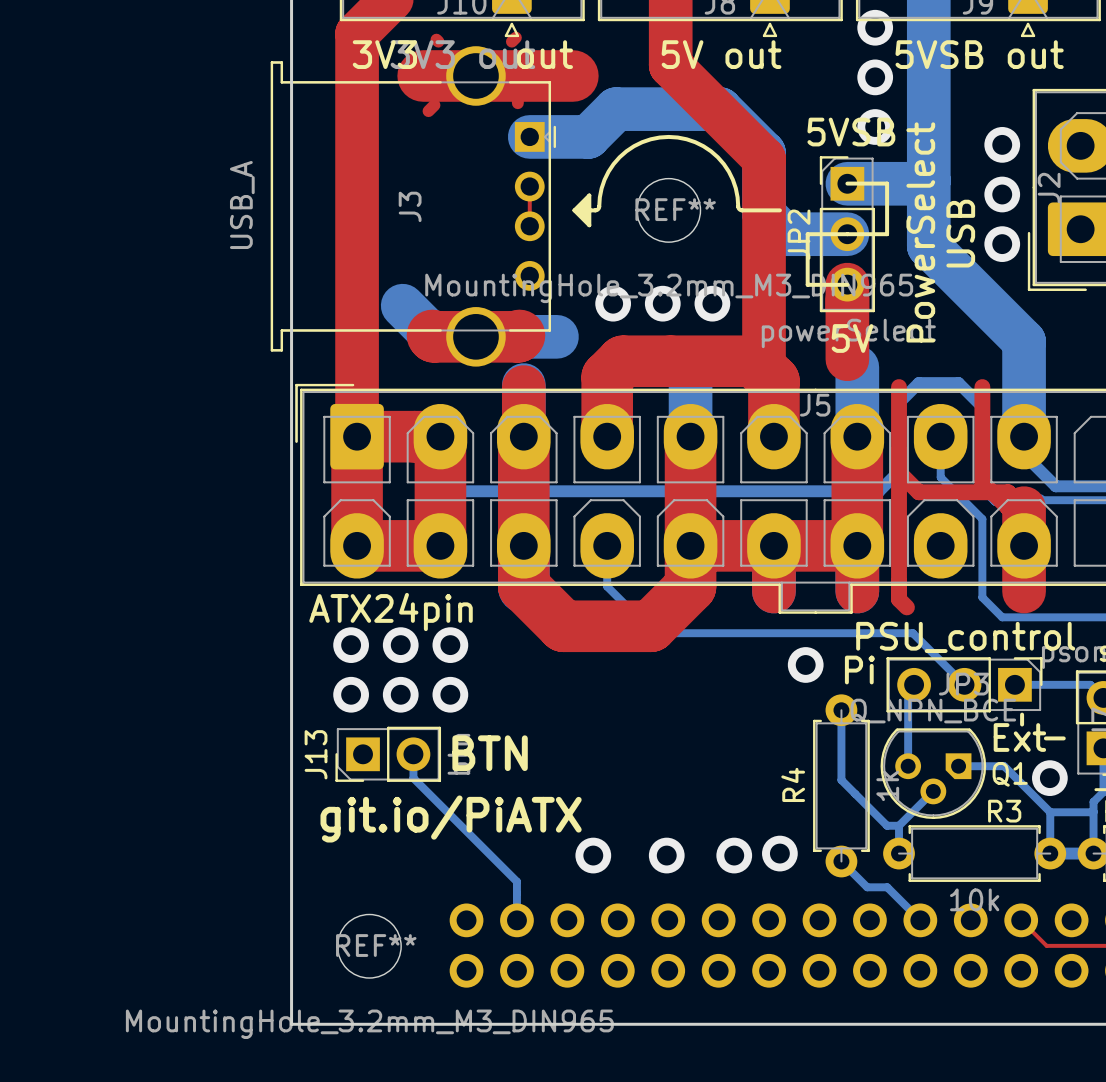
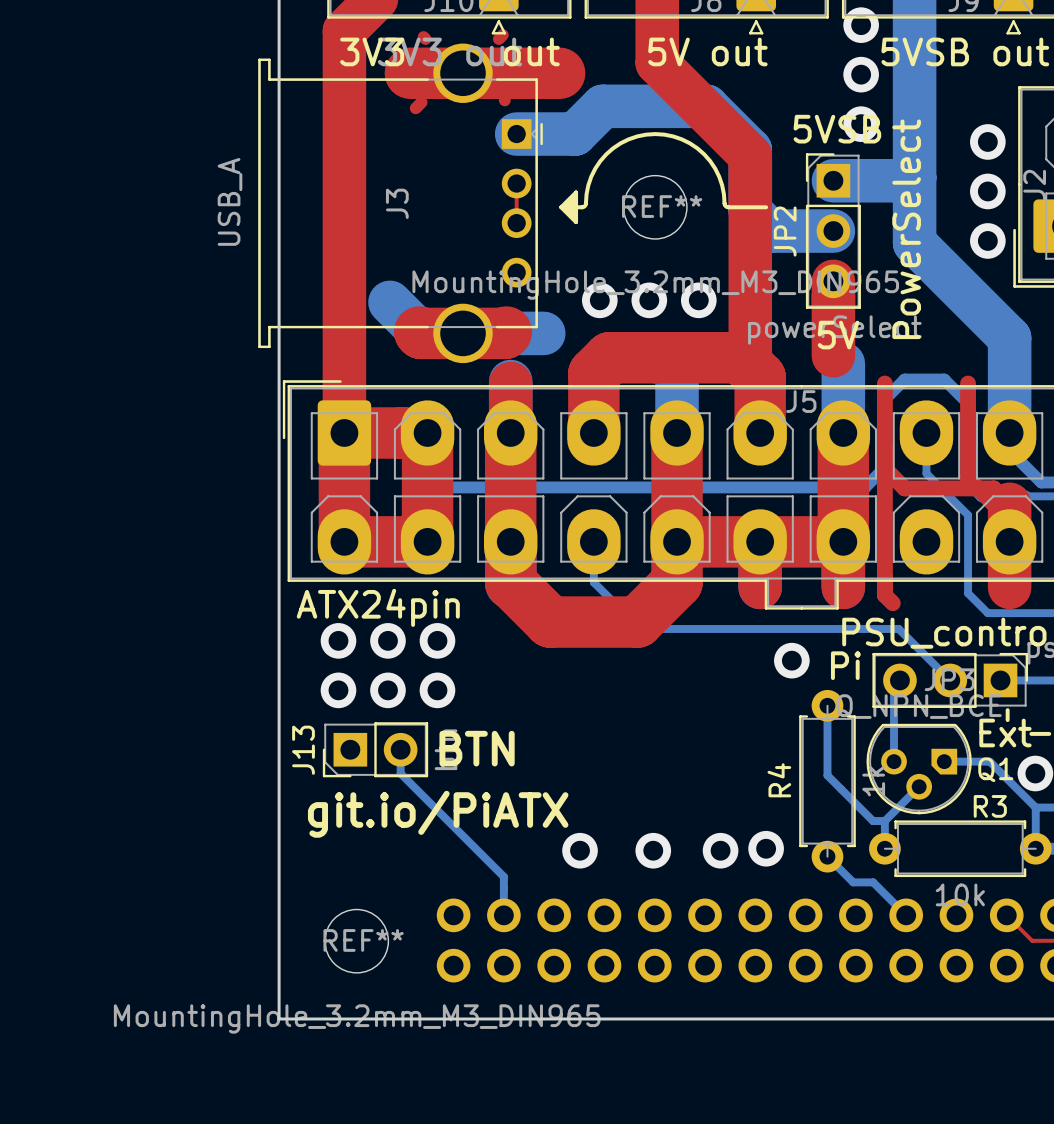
line: (847, 183) (887, 183) (887, 234) (807, 234) (807, 284) (847, 284) -> none
text: USB (960, 233) -> none

